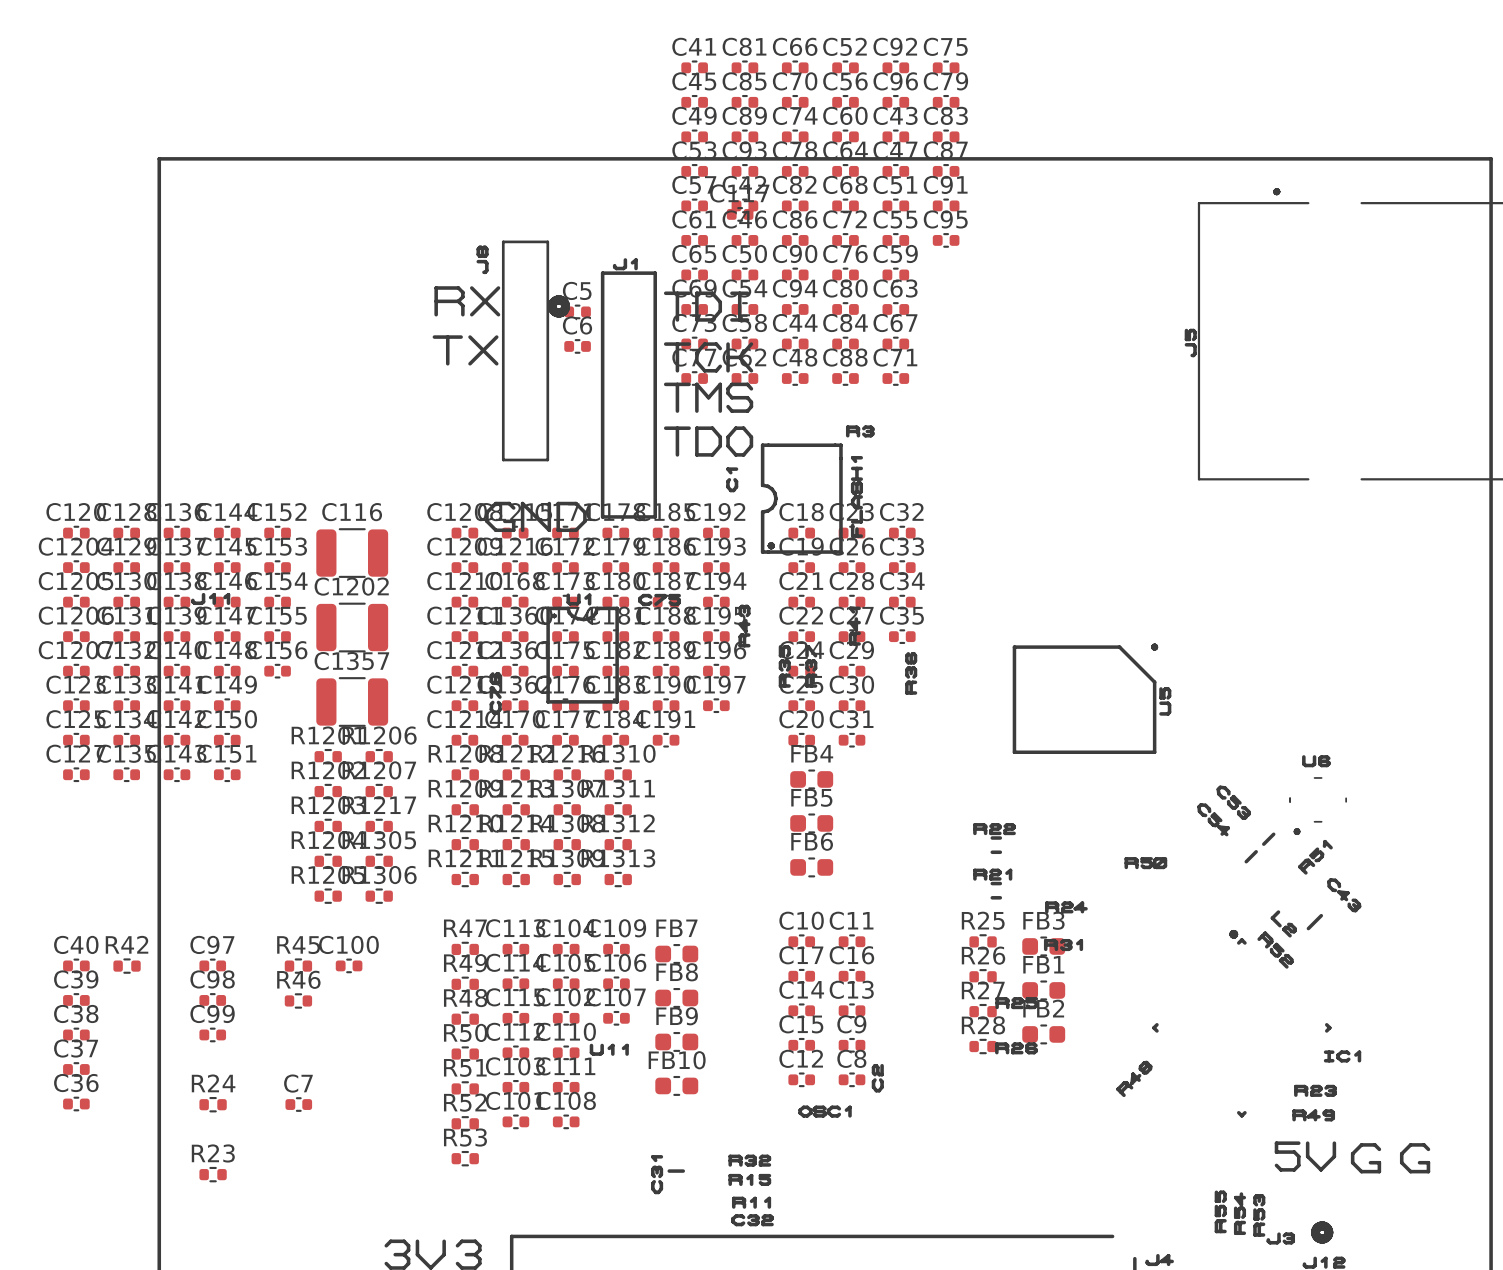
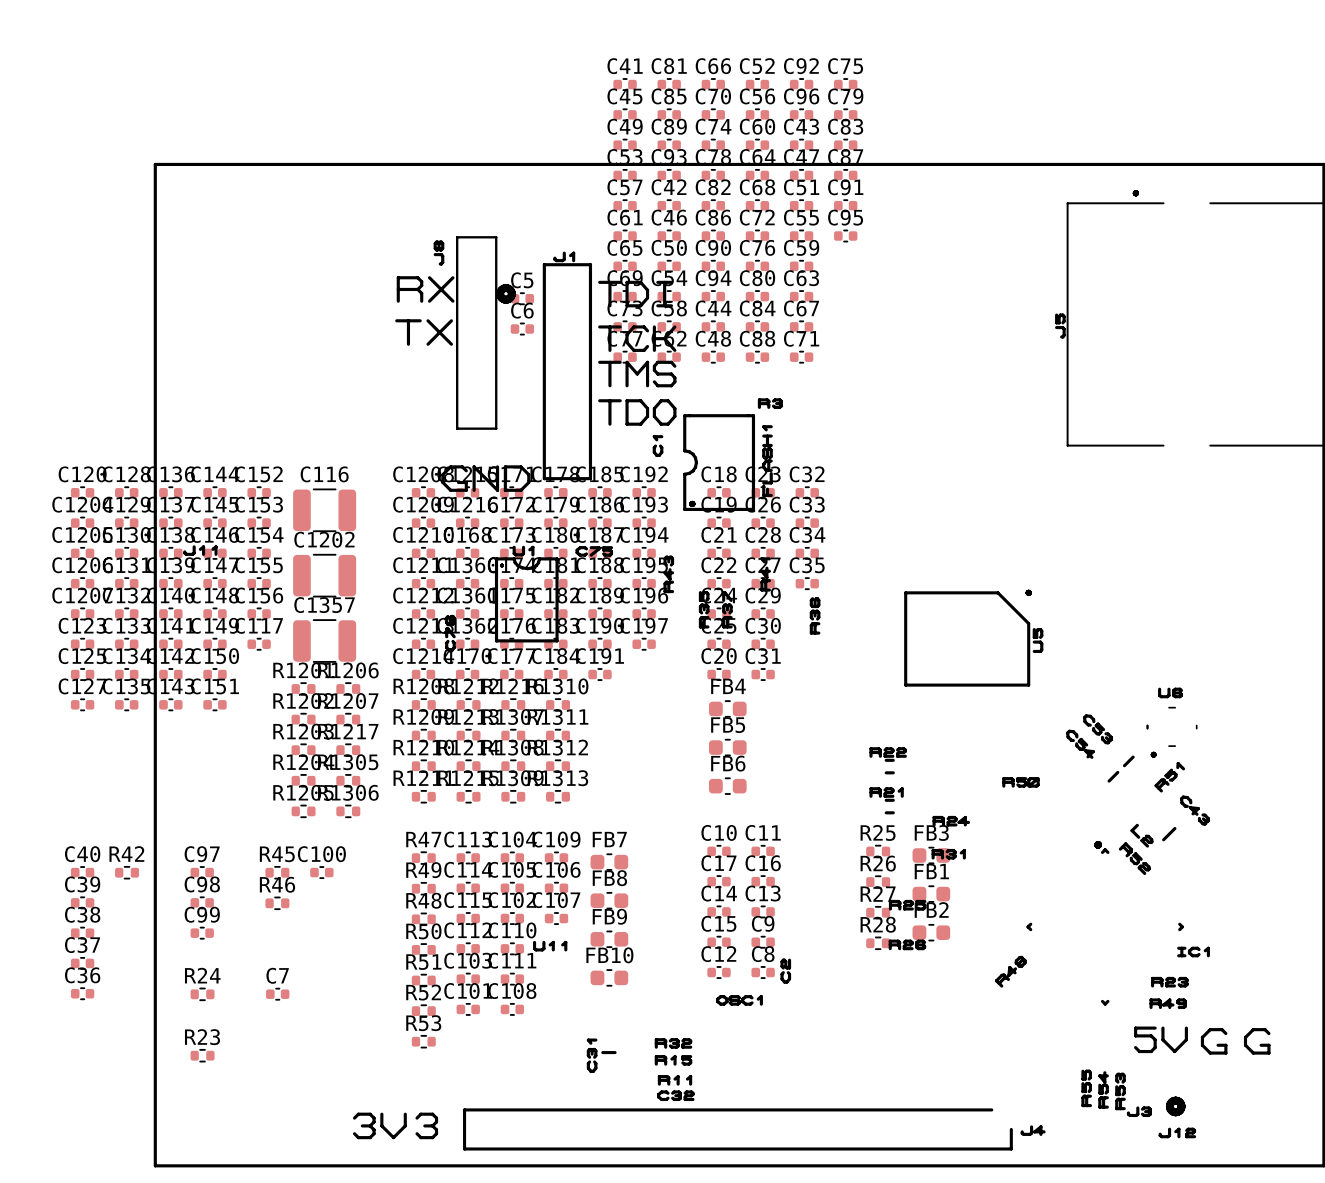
C117 position: (740, 214) -> (259, 644)

